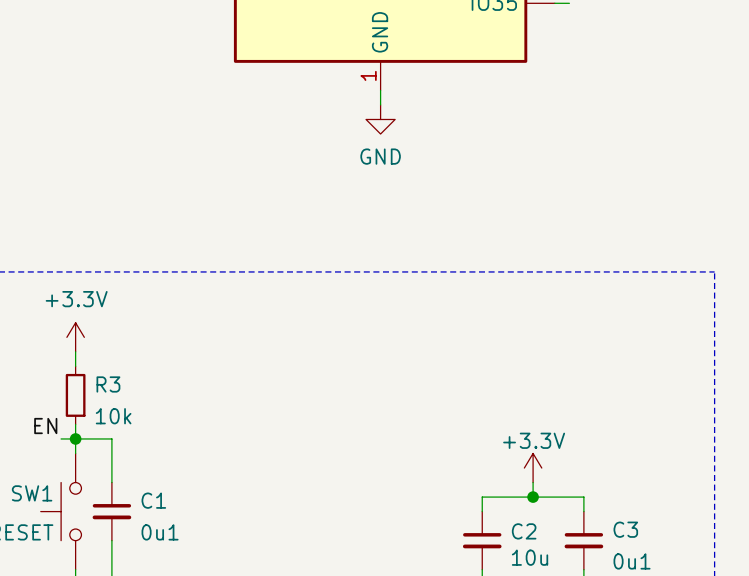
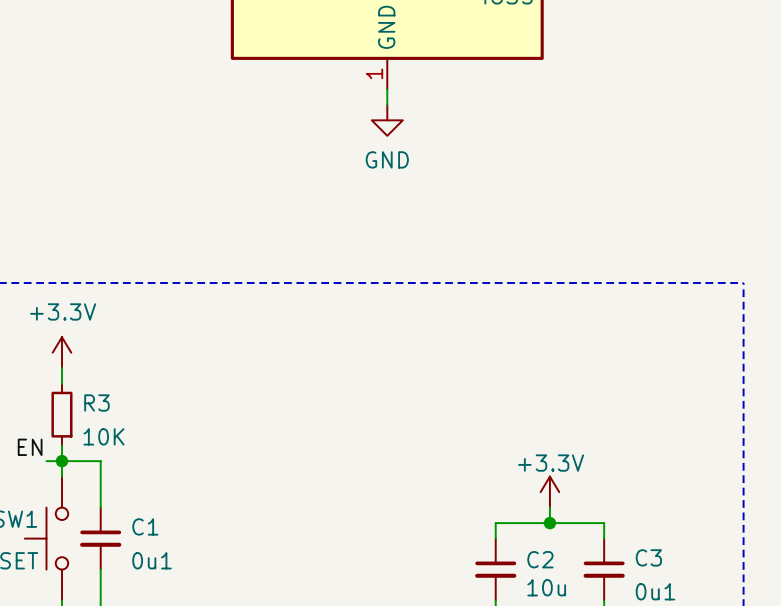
R3 value: 10k (113, 416) -> 10K (103, 436)

